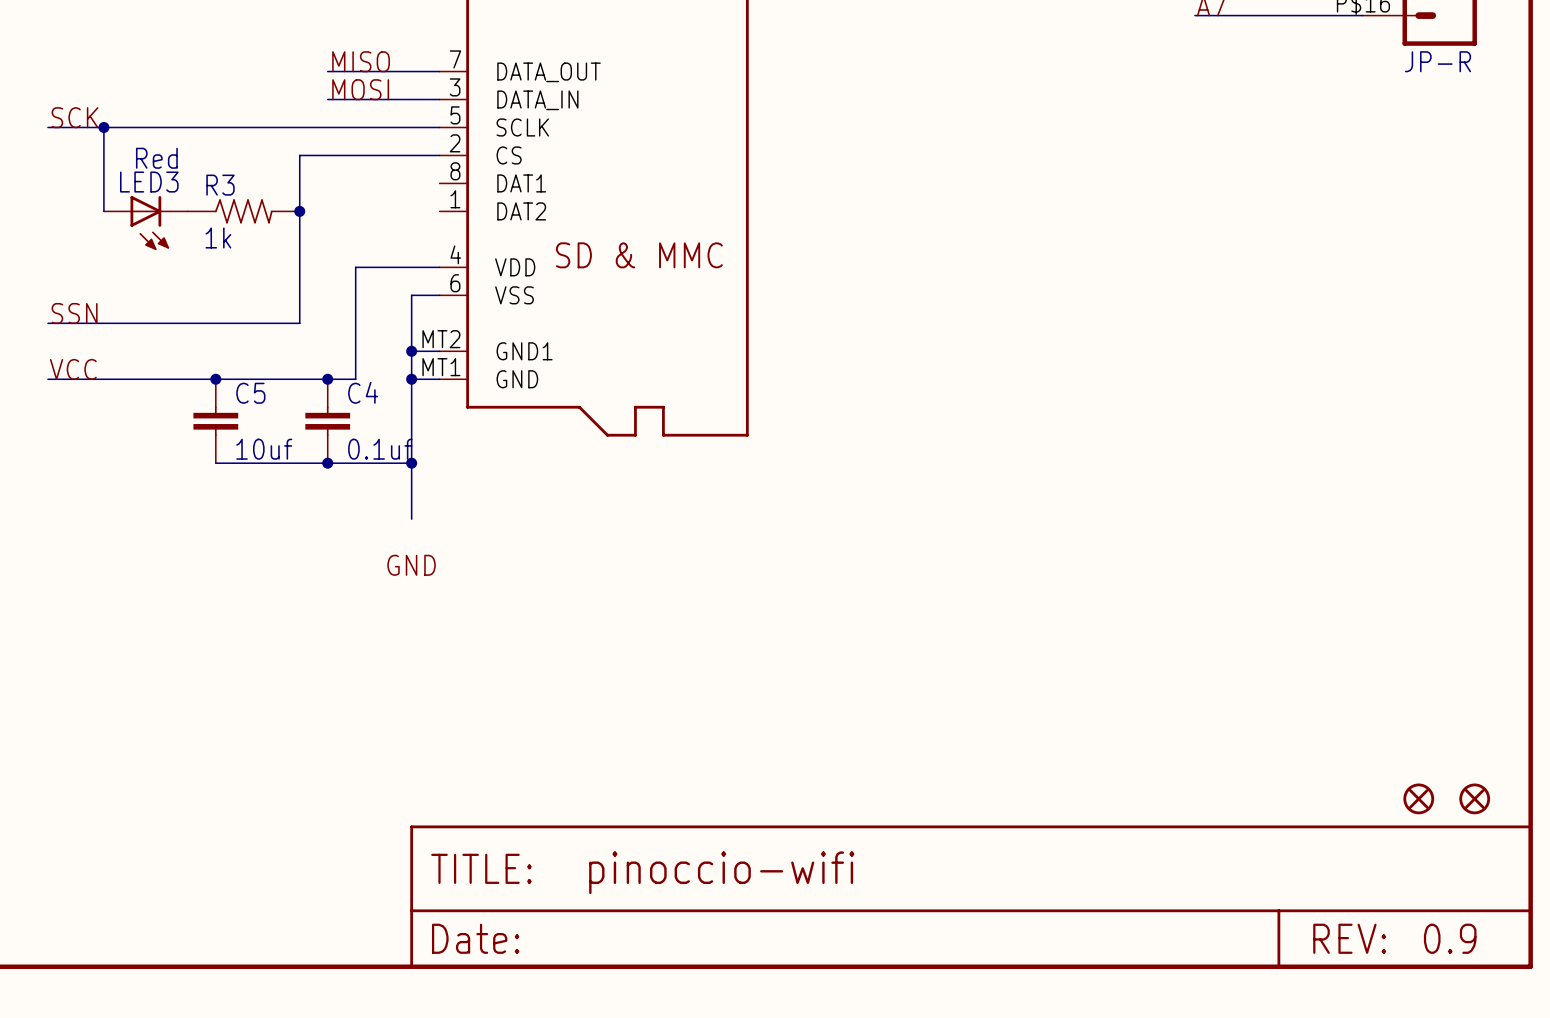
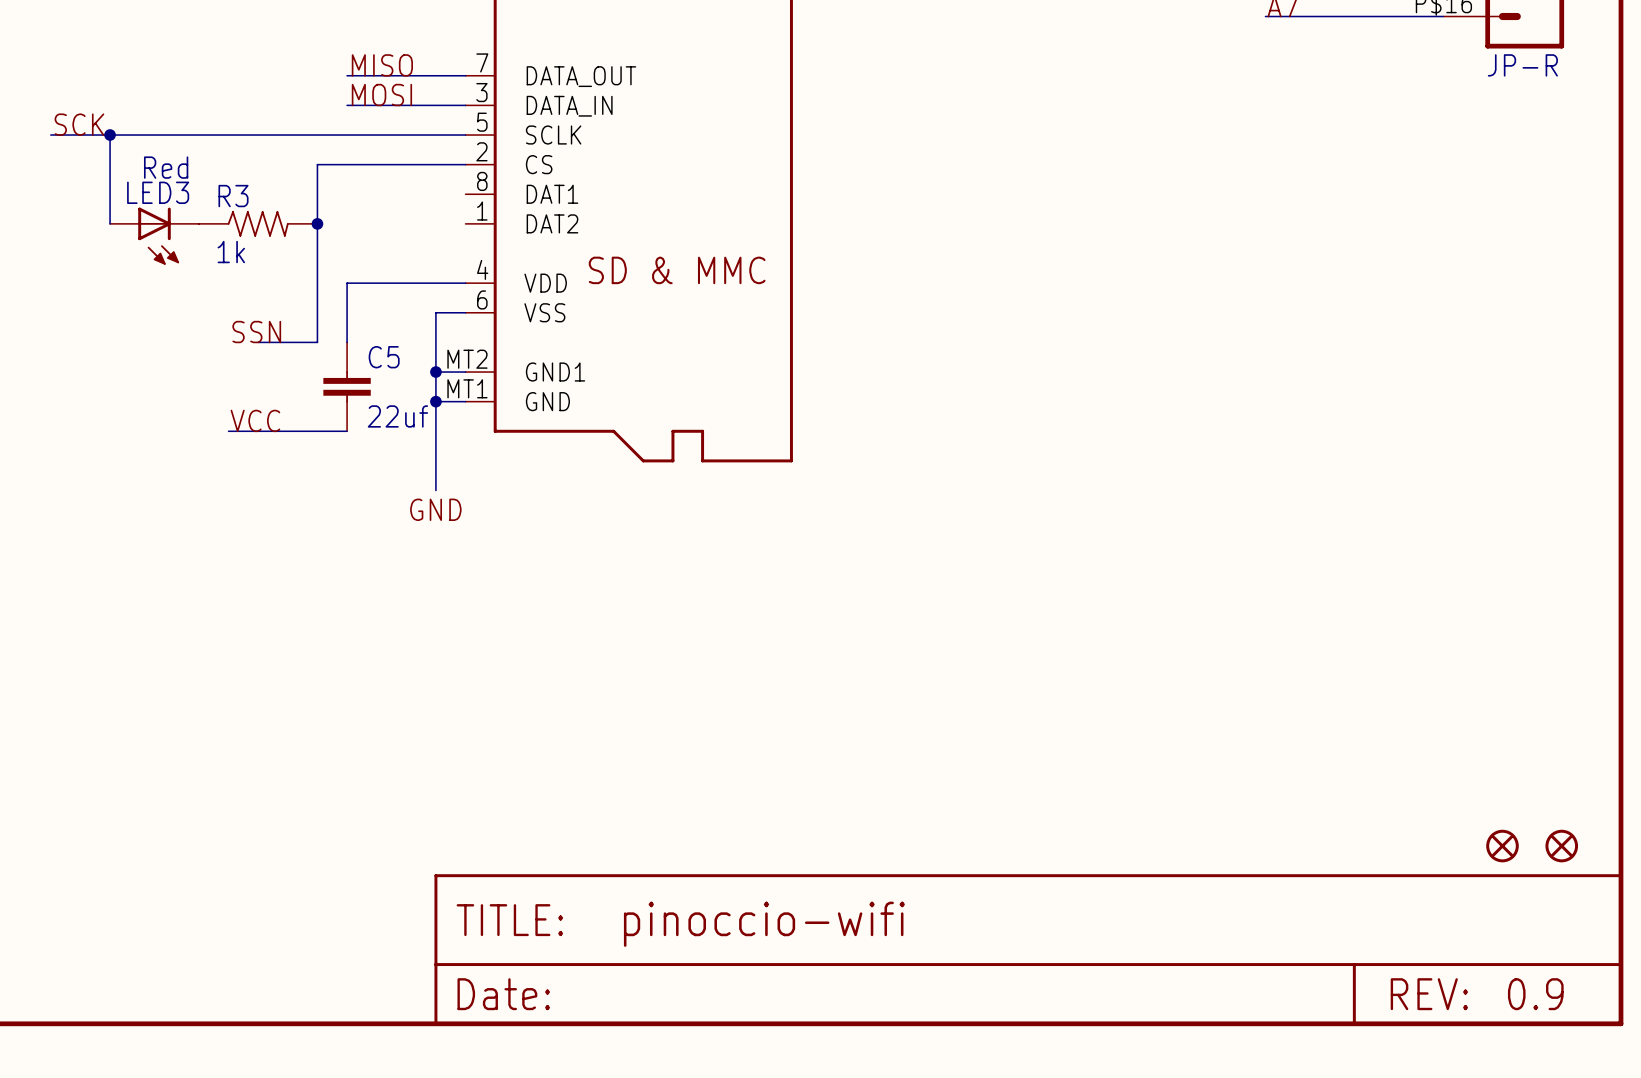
wire: (355, 267) (355, 379) (47, 379) -> (376, 283) (347, 283) (347, 342)
label position: SSN (74, 313) -> SSN (256, 332)
wire: (47, 323) (243, 323) -> none
label position: VCC (73, 369) -> VCC (255, 420)
junction: (215, 379) -> none
junction: (327, 379) -> none
wire: none -> (228, 431) (347, 431)
C5 position: (215, 421) -> (347, 386)
C4: 0.1uf (327, 421) -> none
C5 value: 10uf (264, 449) -> 22uf (397, 416)
wire: (215, 463) (411, 463) (411, 519) -> none
junction: (327, 463) -> none
junction: (411, 463) -> none
label position: GND (411, 565) -> GND (435, 509)

